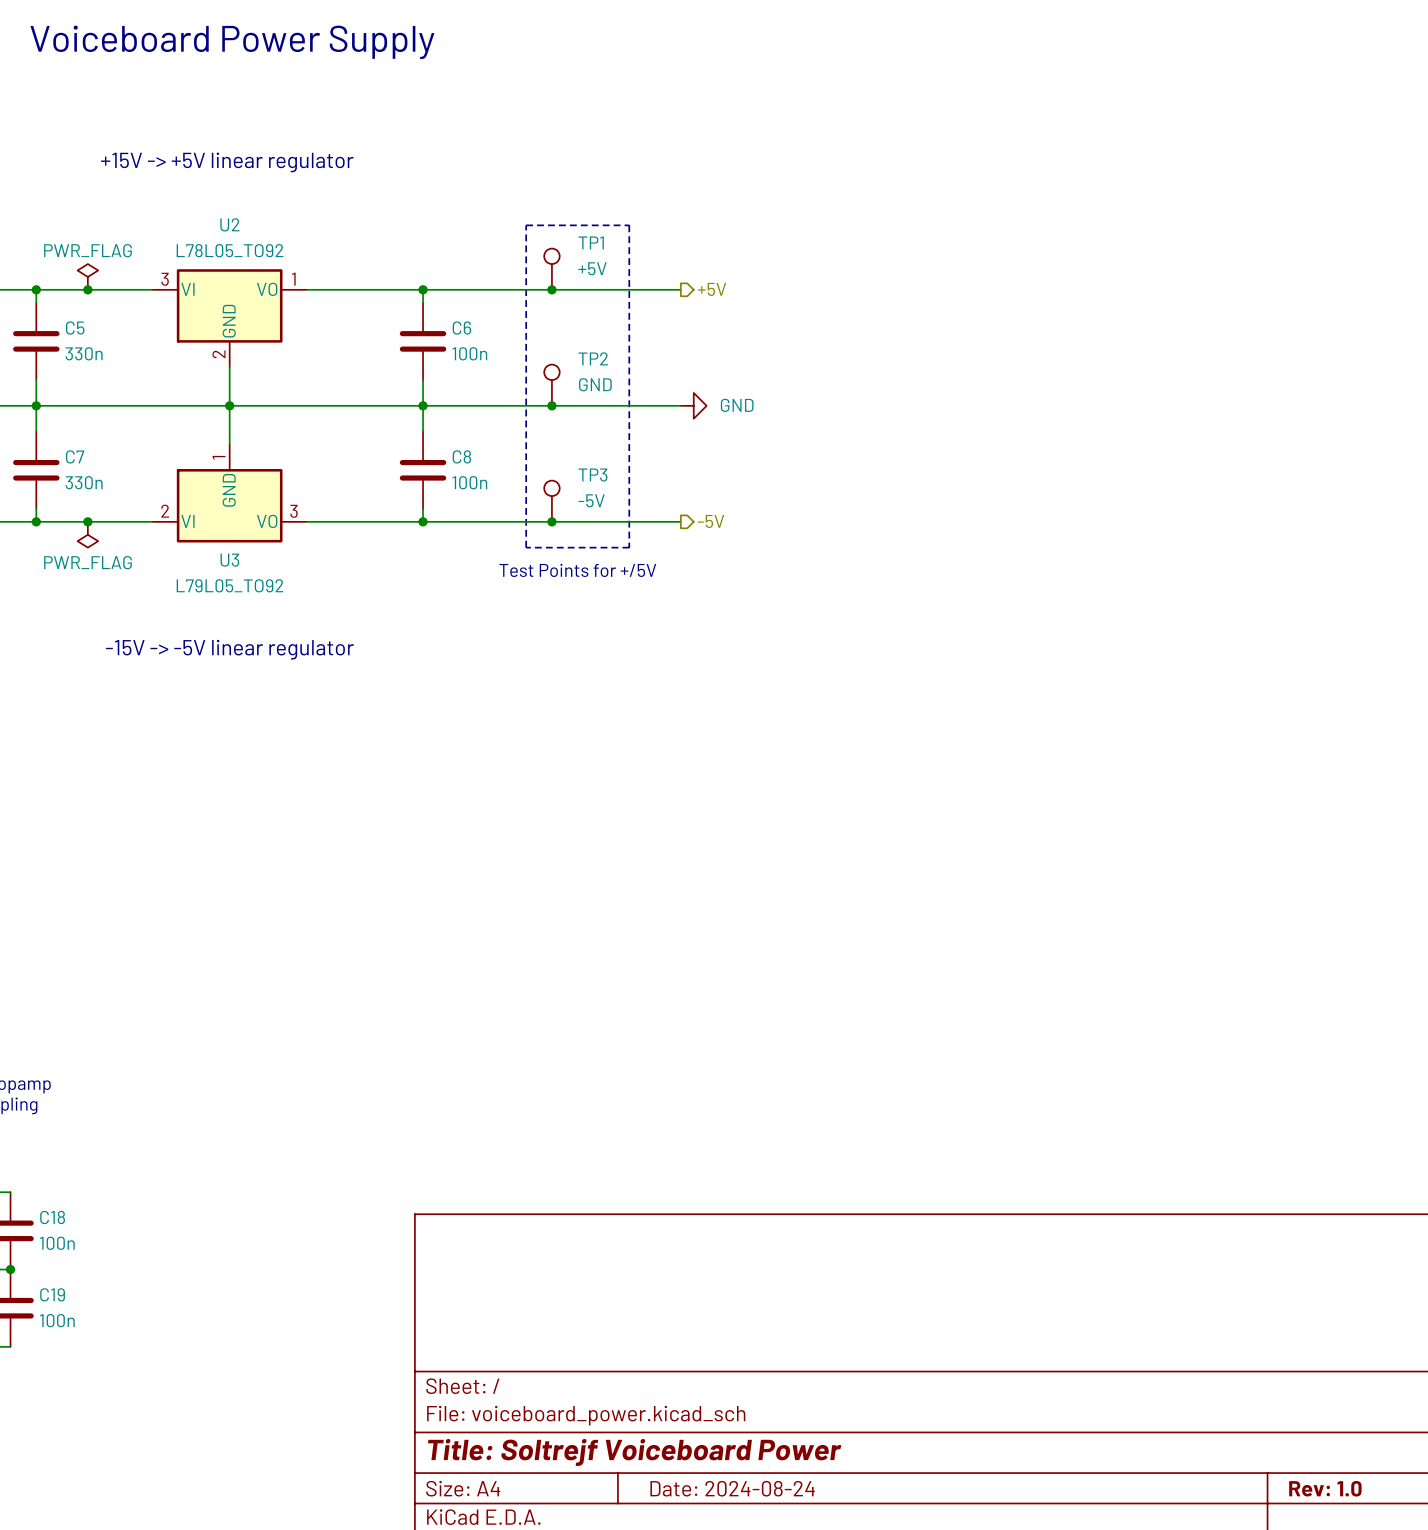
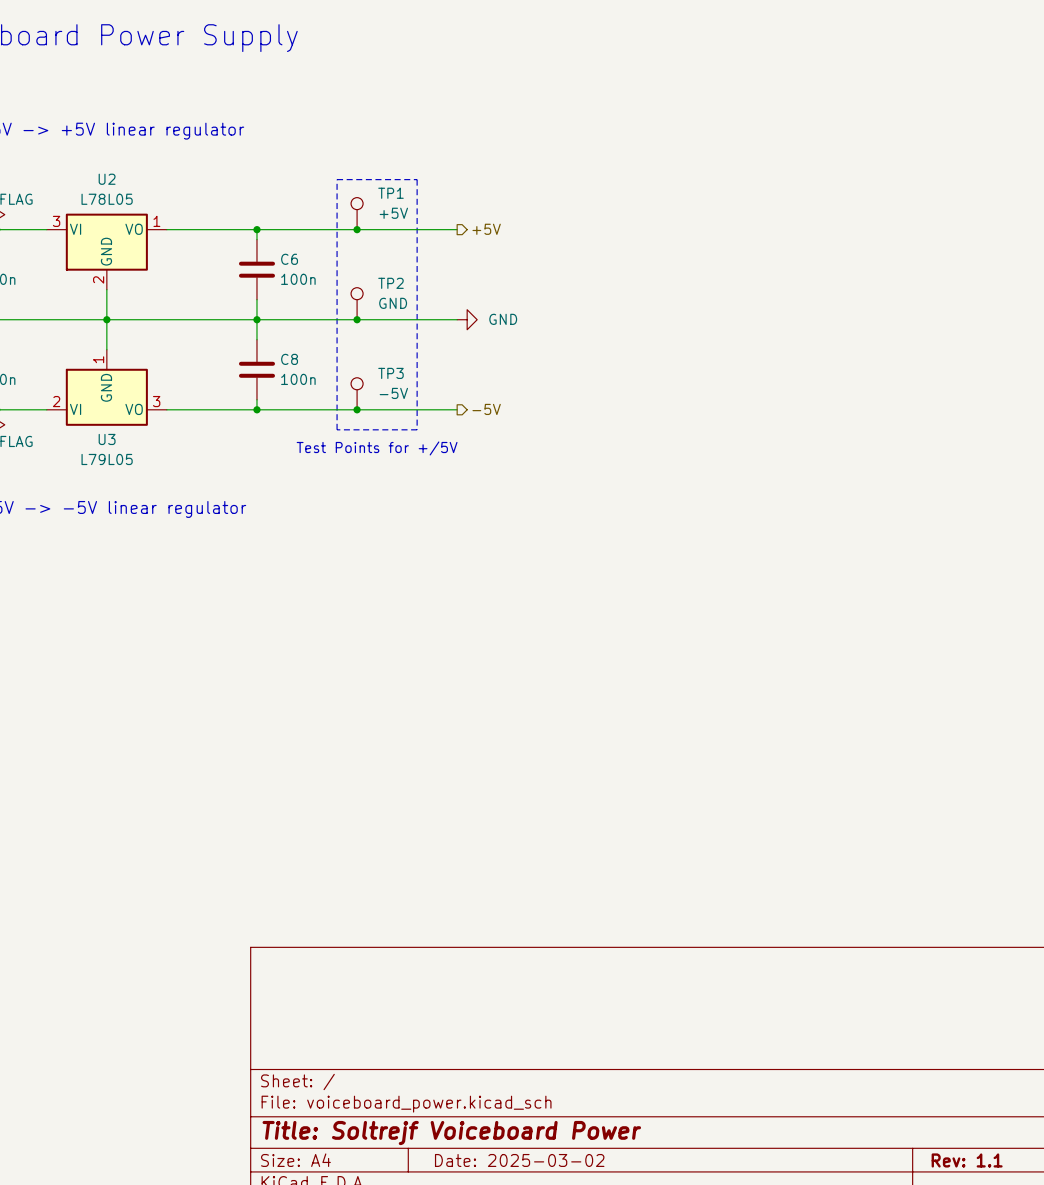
U2 value: L78L05_TO92 (230, 250) -> L78L05 (107, 199)
U3 value: L79L05_TO92 (230, 585) -> L79L05 (107, 459)
title block: Date: 2024-08-24 (732, 1488) -> Date: 2025-03-02 (519, 1160)
title block: Rev: 1.0 (1325, 1488) -> Rev: 1.1 (967, 1160)

